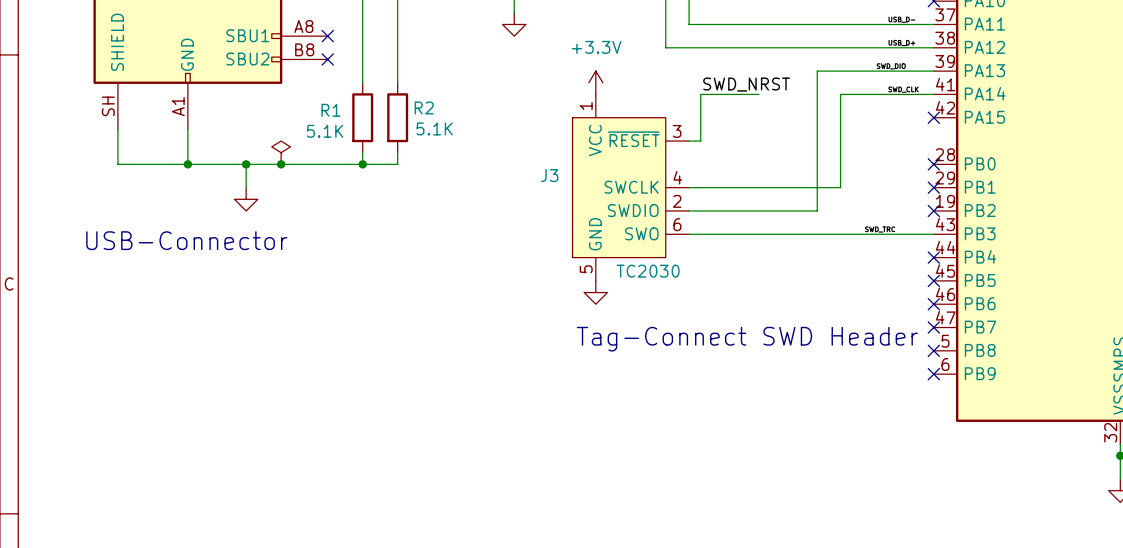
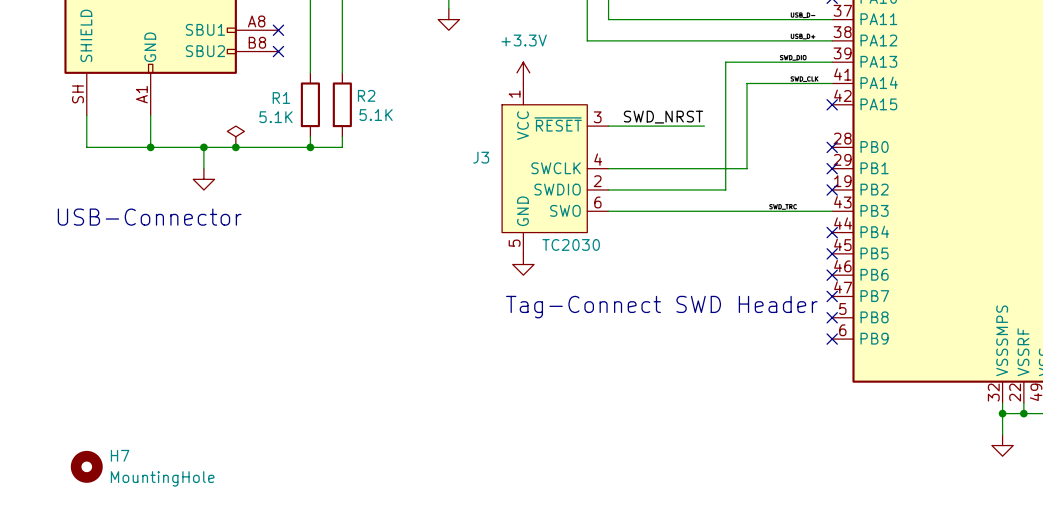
label position: SWD_NRST (746, 84) -> SWD_NRST (663, 117)
wire: (759, 94) (700, 94) (700, 141) -> (704, 126) (619, 126)
H7: none -> MountingHole (86, 466)

